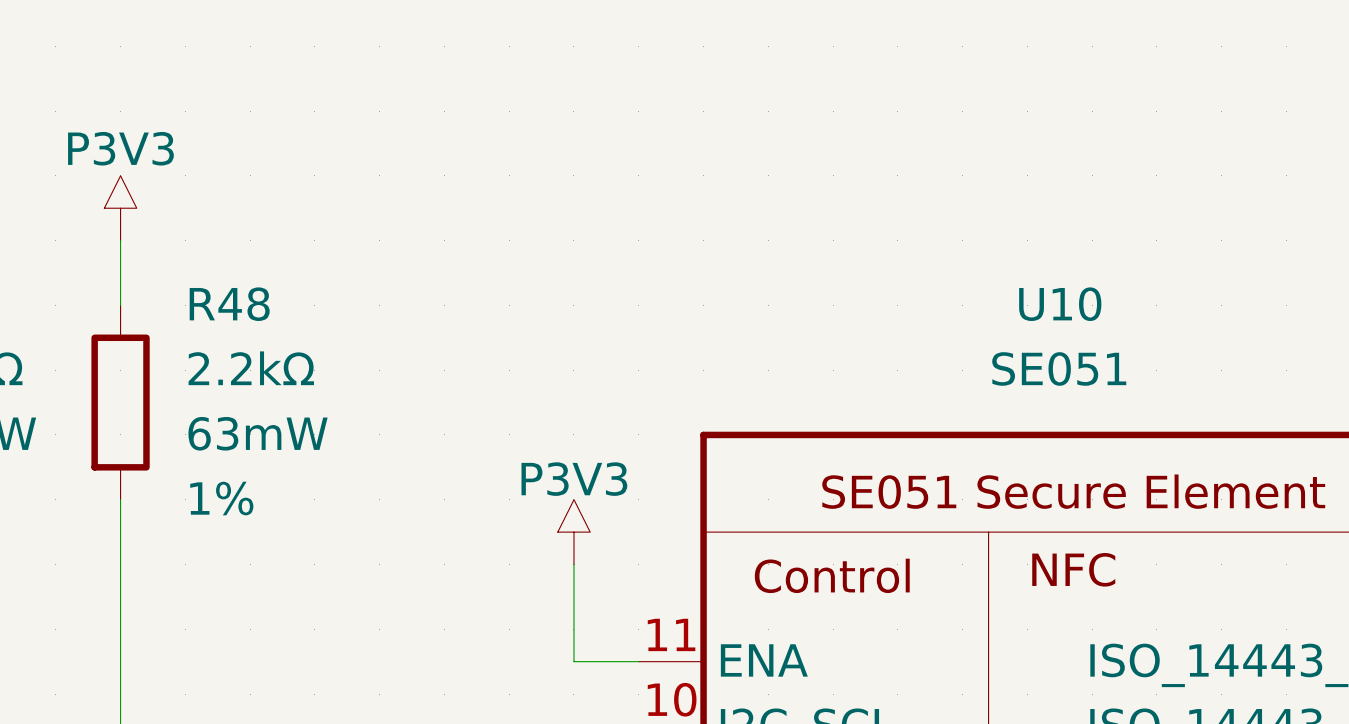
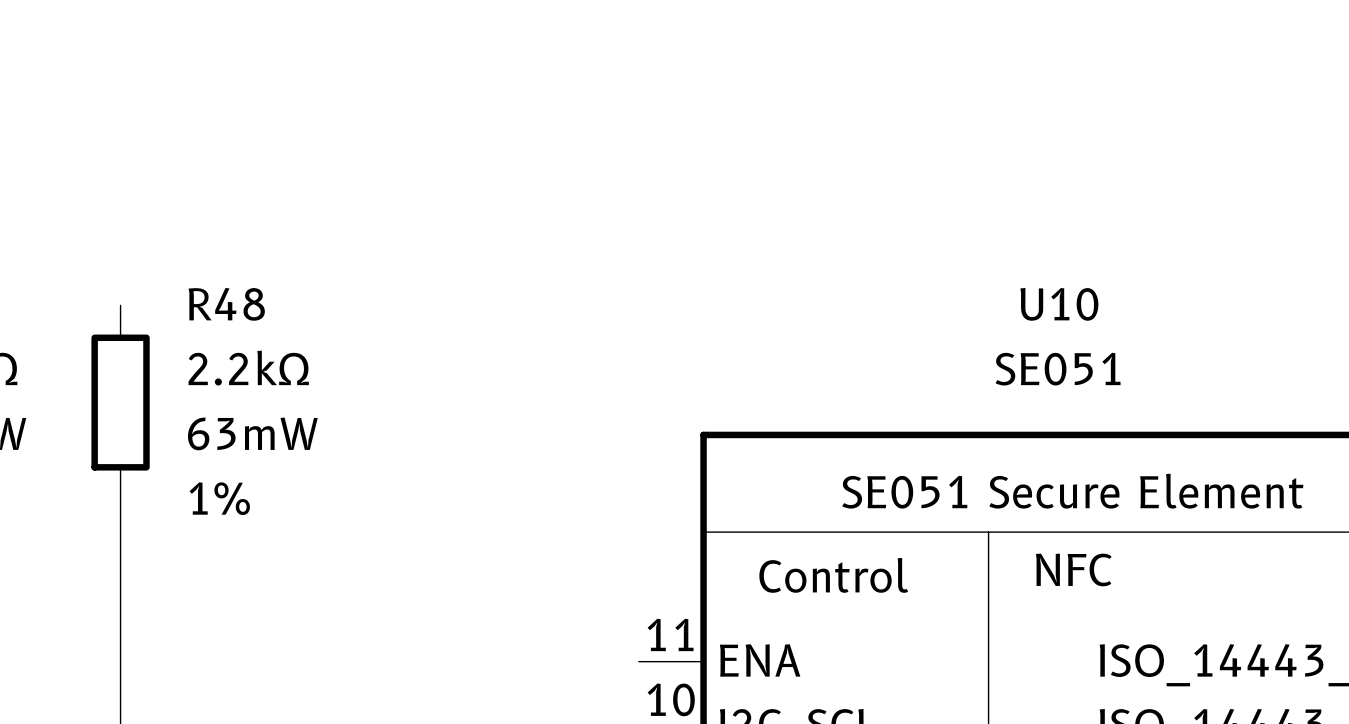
power symbol: P3V3 (120, 208) -> none
wire: (120, 240) (120, 305) -> none
power symbol: P3V3 (573, 532) -> none
wire: (573, 564) (573, 661) (638, 661) -> none

